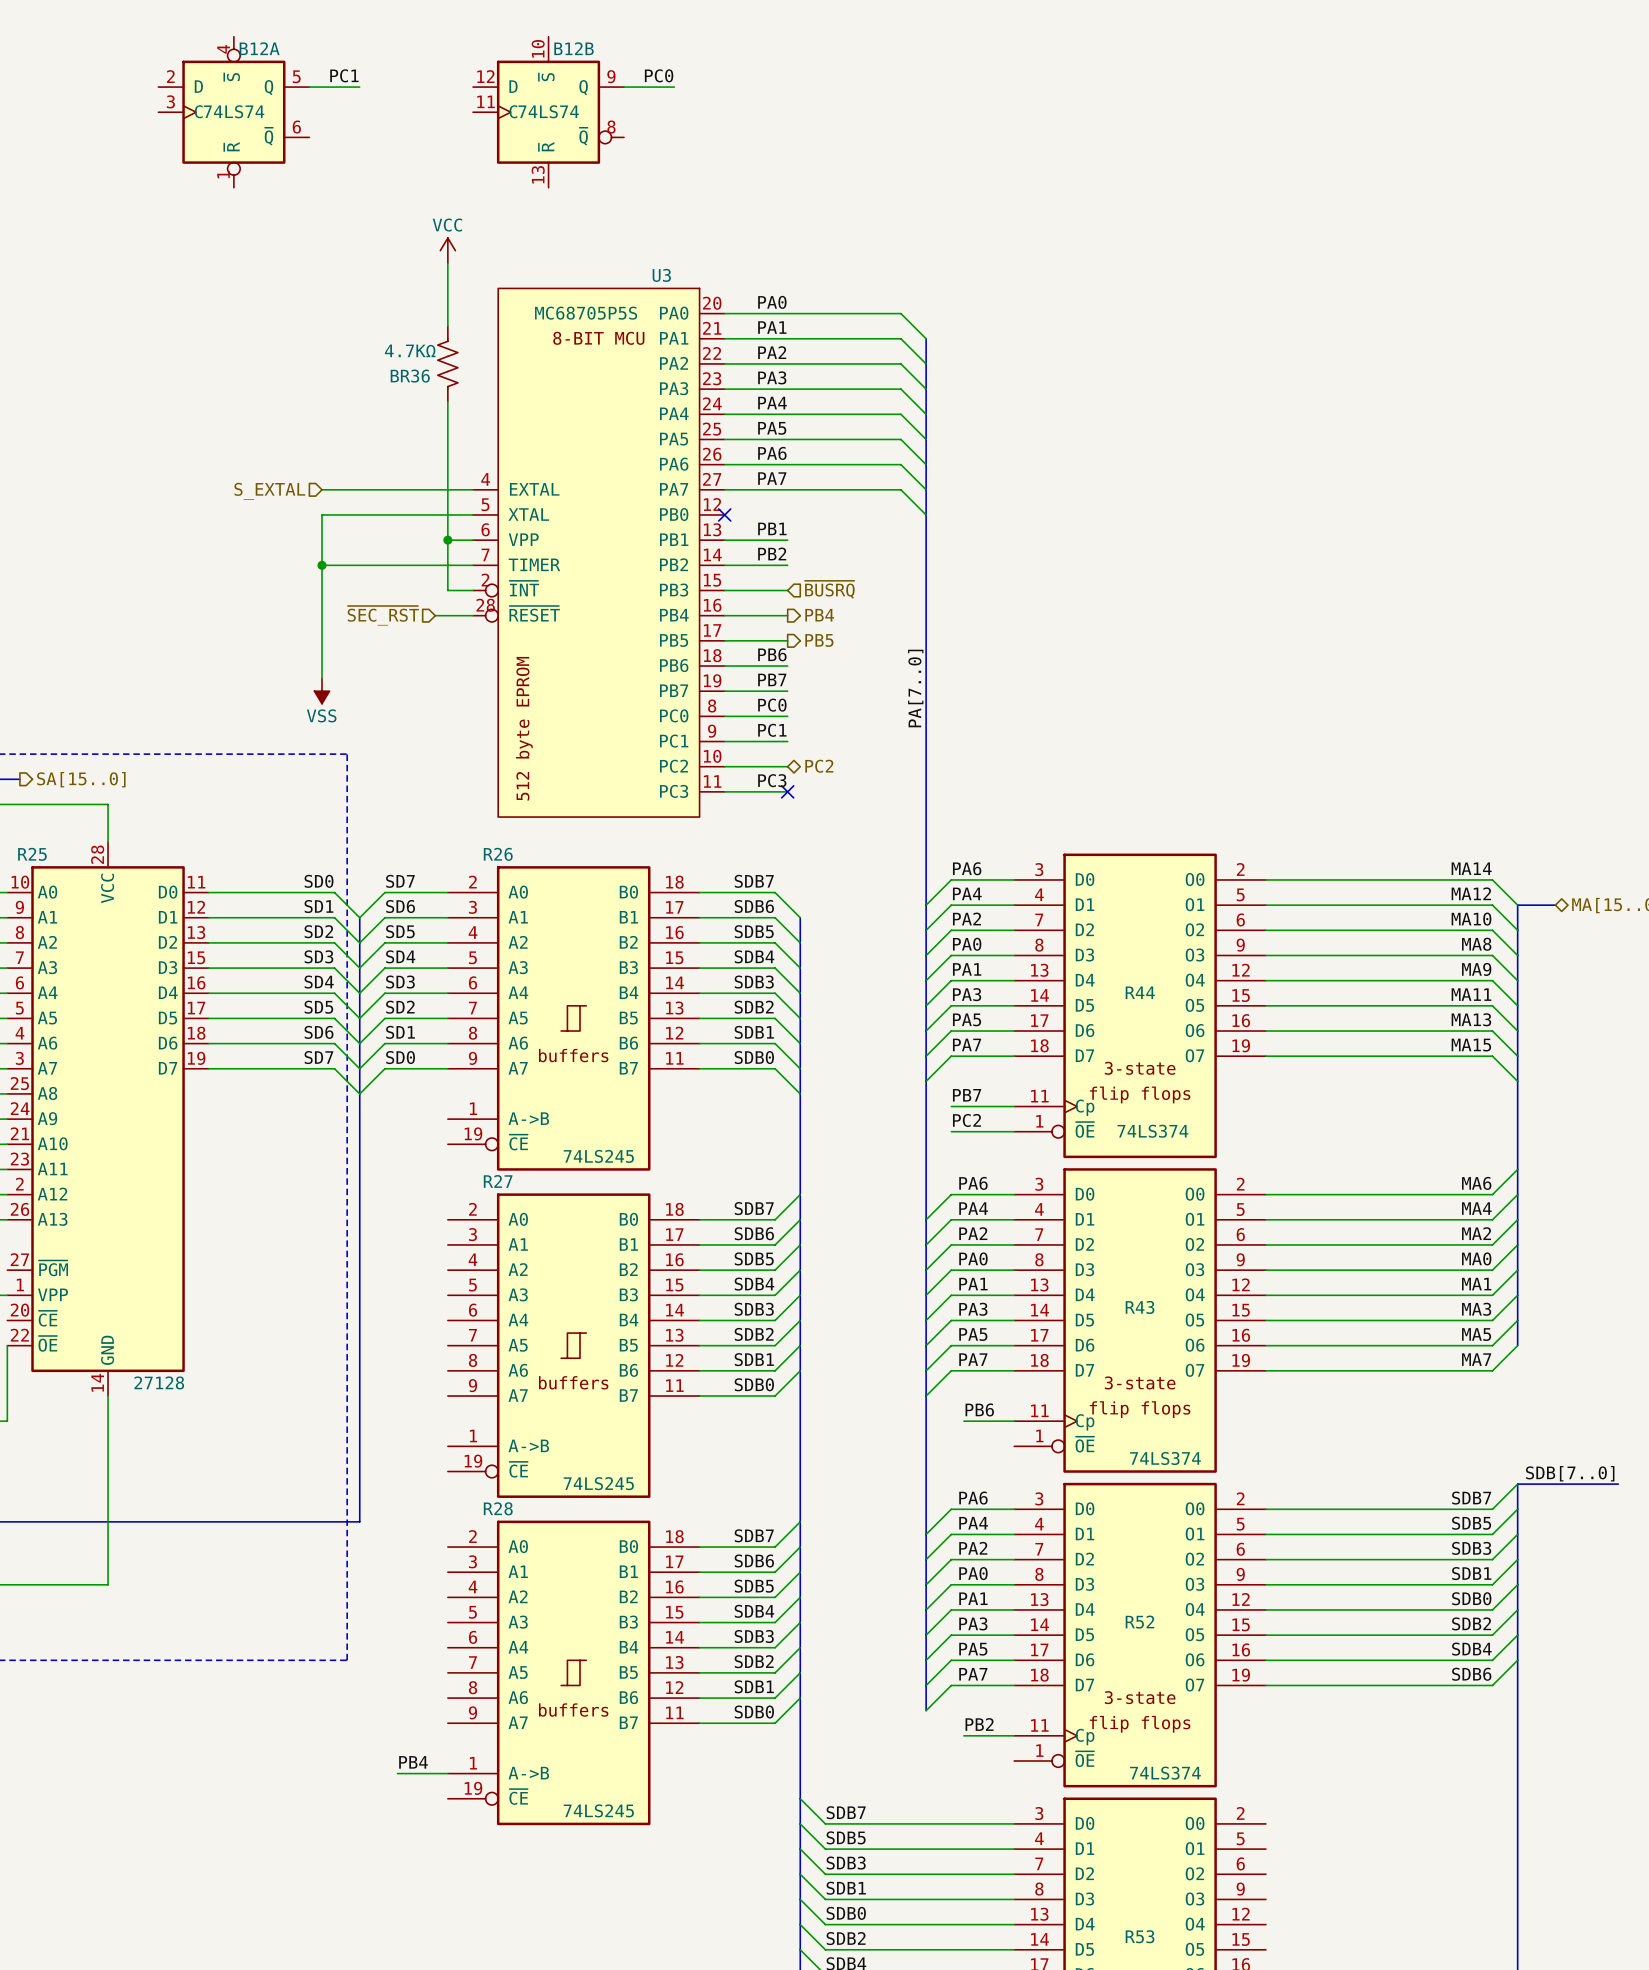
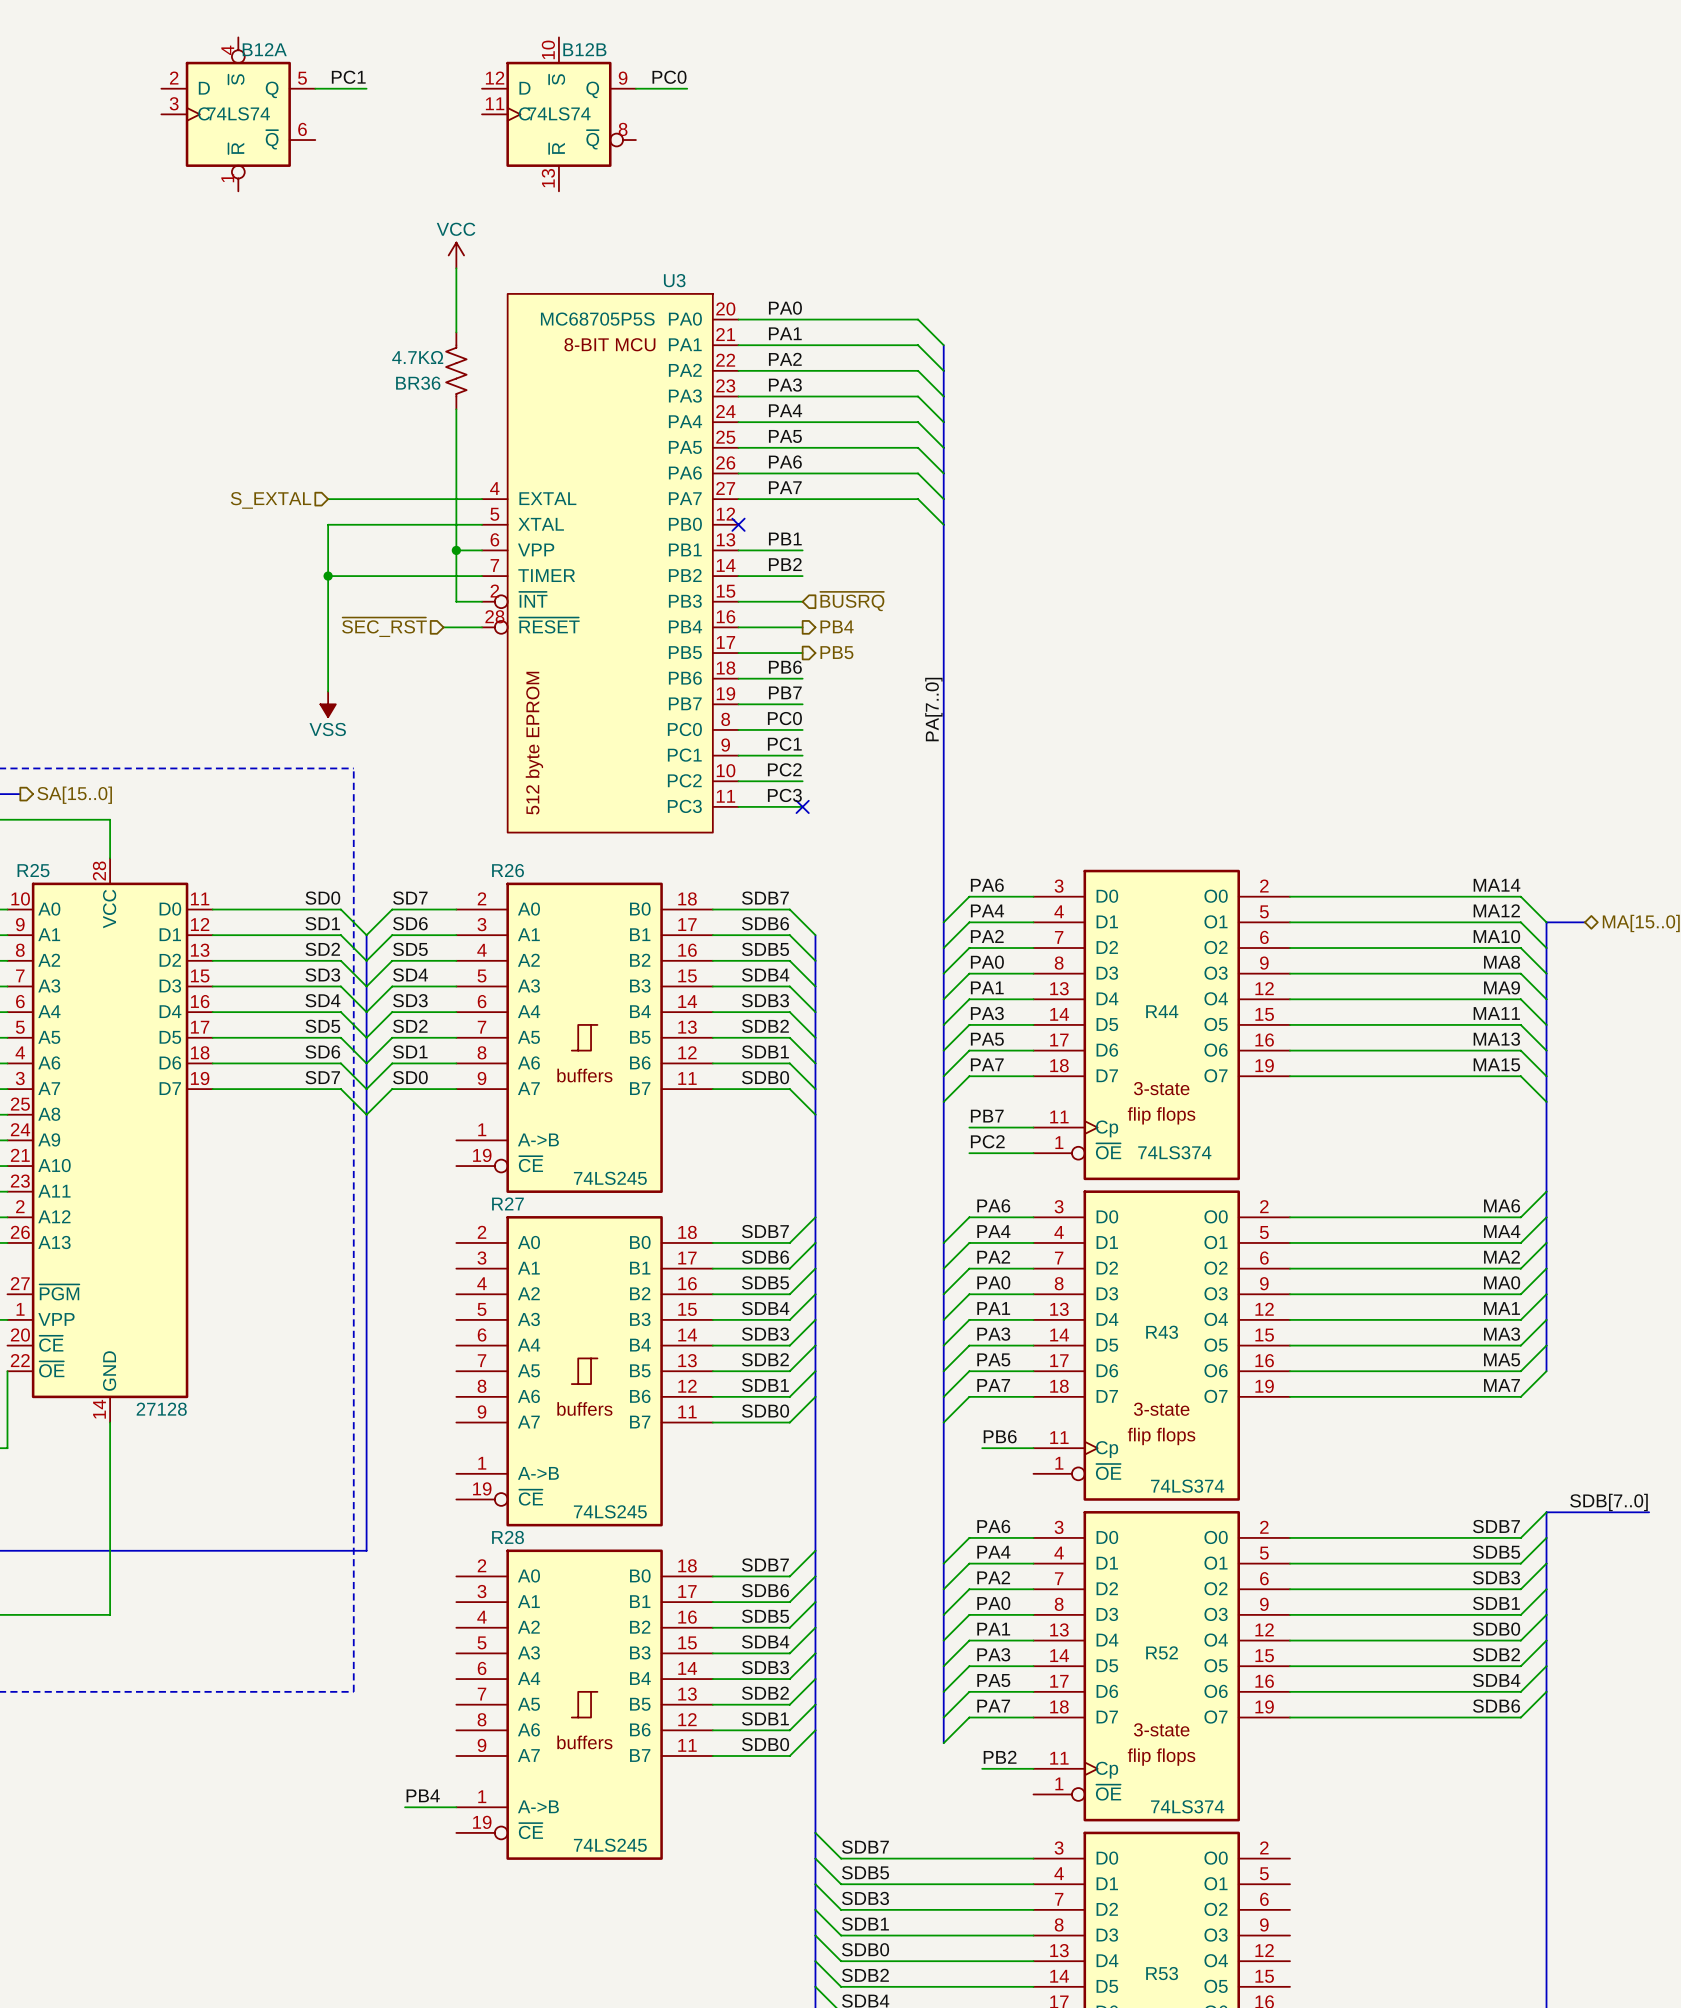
label: none -> PC2 (784, 769)
hierarchical label: PC2 (819, 766) -> none

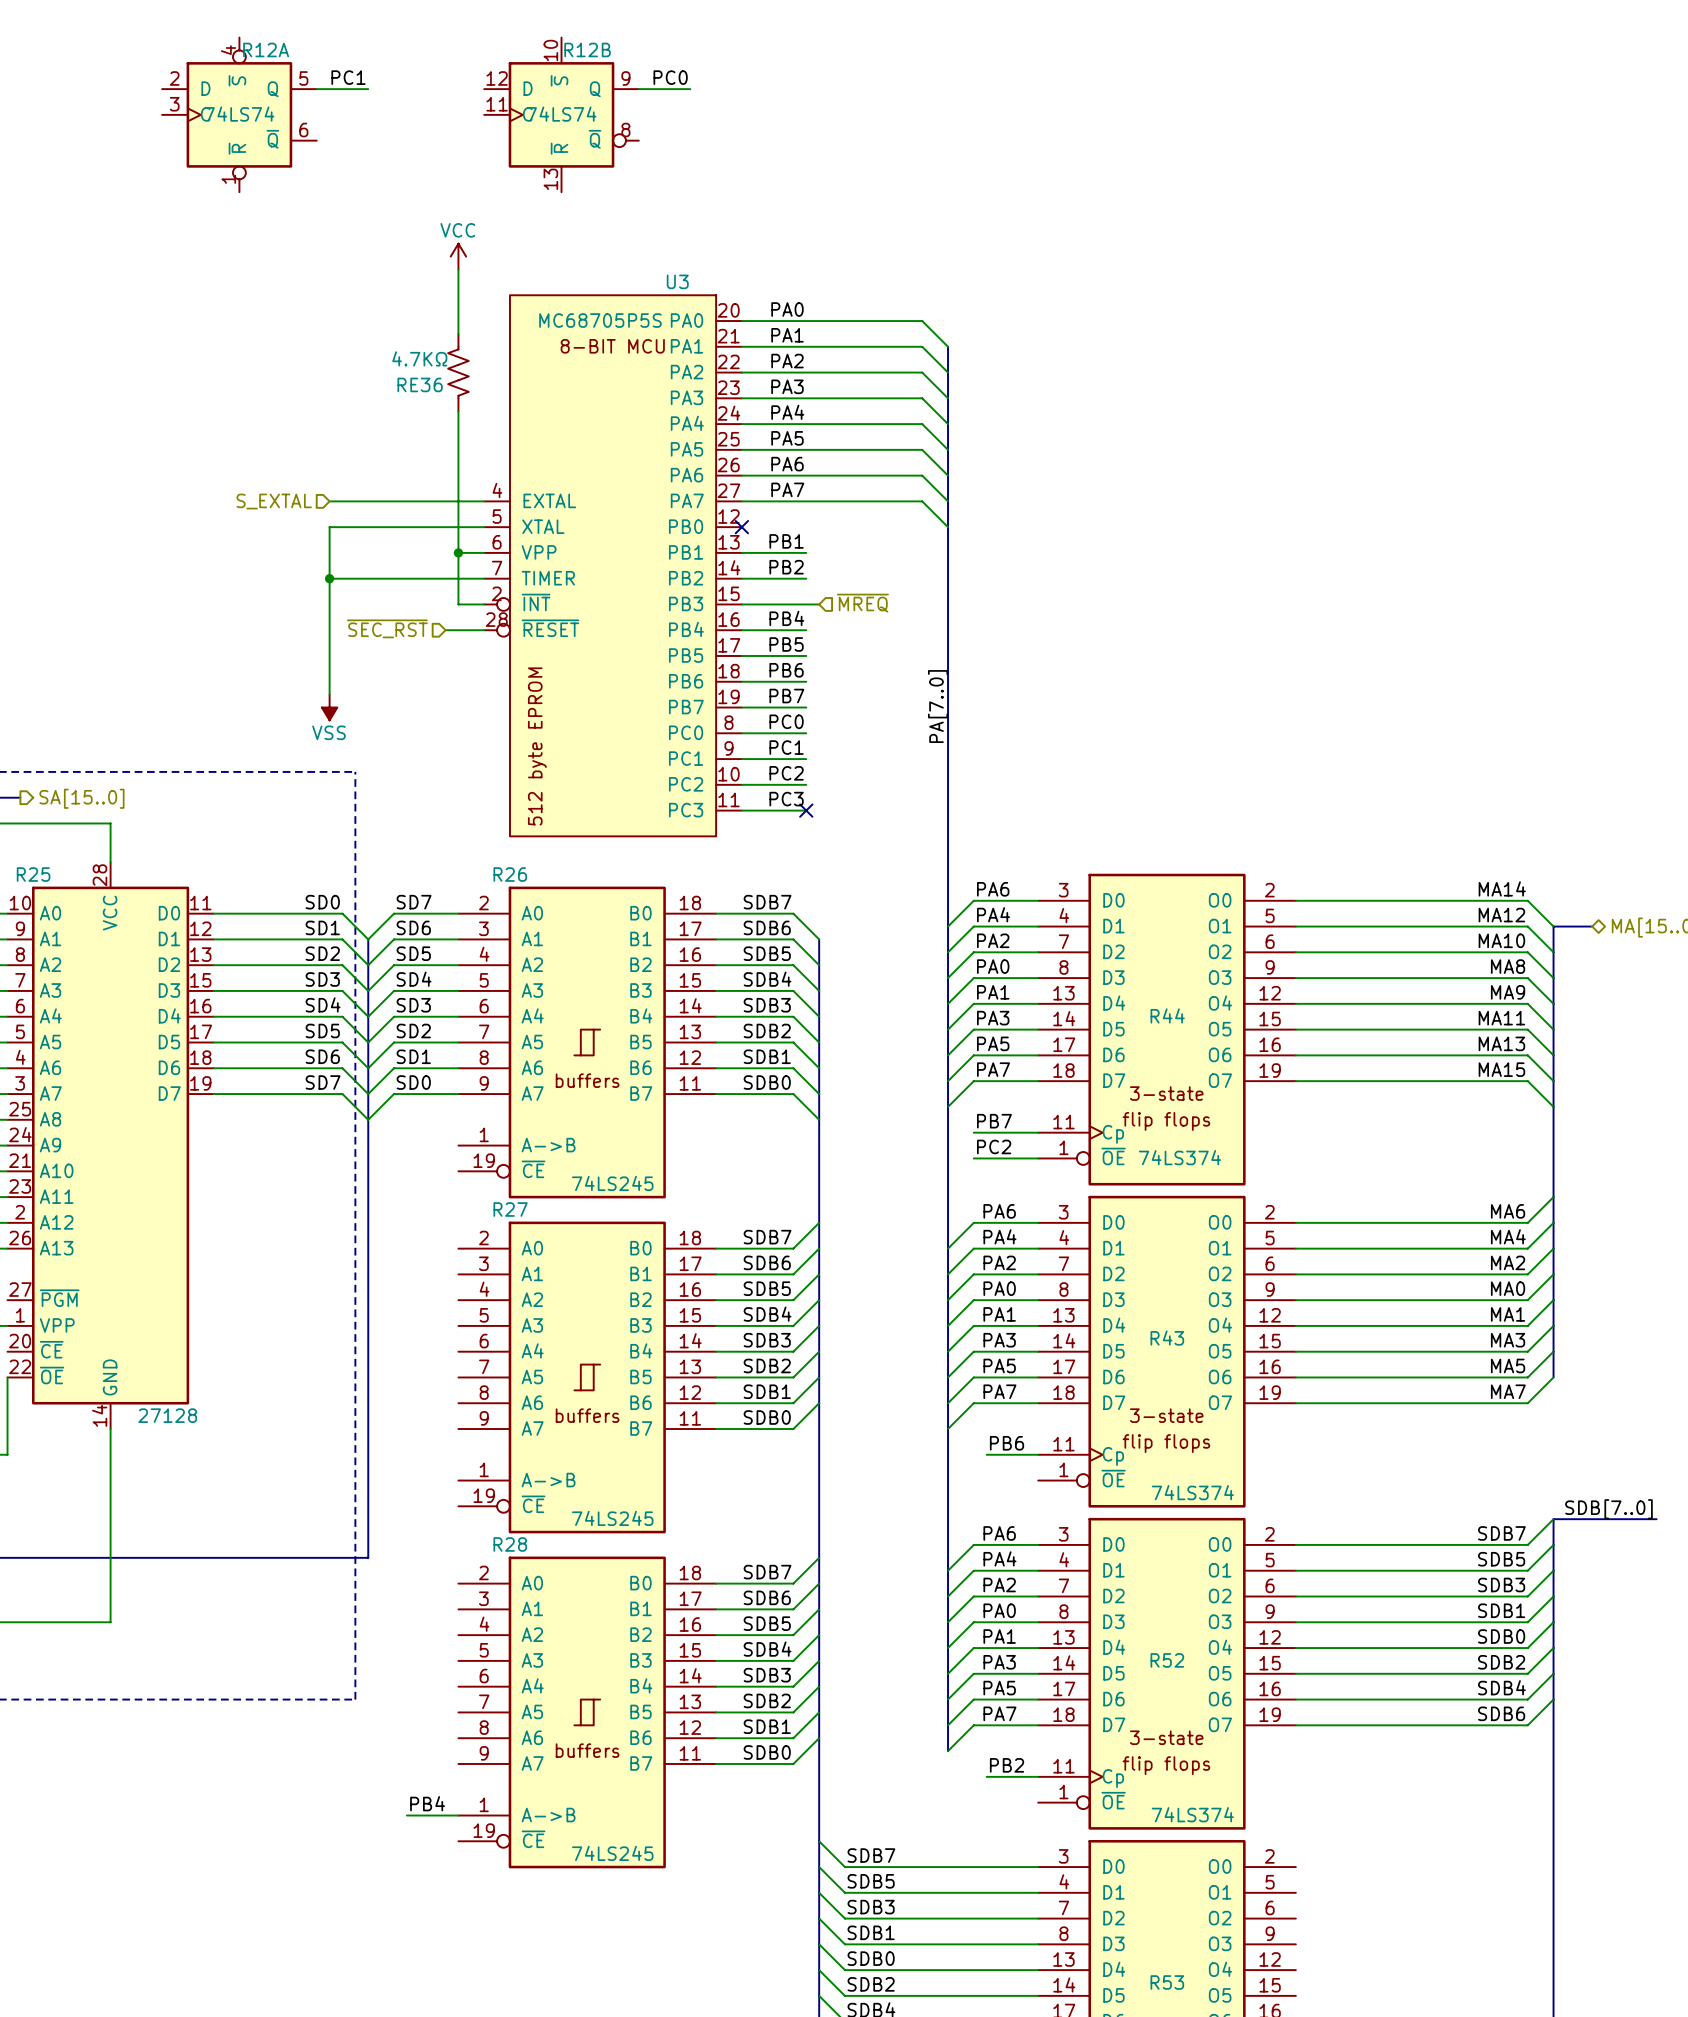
B12A name: B12A (264, 49) -> R12A (266, 49)
B12B name: B12B (584, 49) -> R12B (587, 49)
BR36 name: BR36 (418, 383) -> RE36 (420, 384)
wire: none -> (806, 604) (819, 604)
hierarchical label: ~{BUSRQ} (852, 601) -> ~{MREQ} (862, 603)
label: none -> PB4 (786, 618)
hierarchical label: PB4 (837, 626) -> none
label: none -> PB5 (786, 644)
hierarchical label: PB5 (836, 652) -> none

